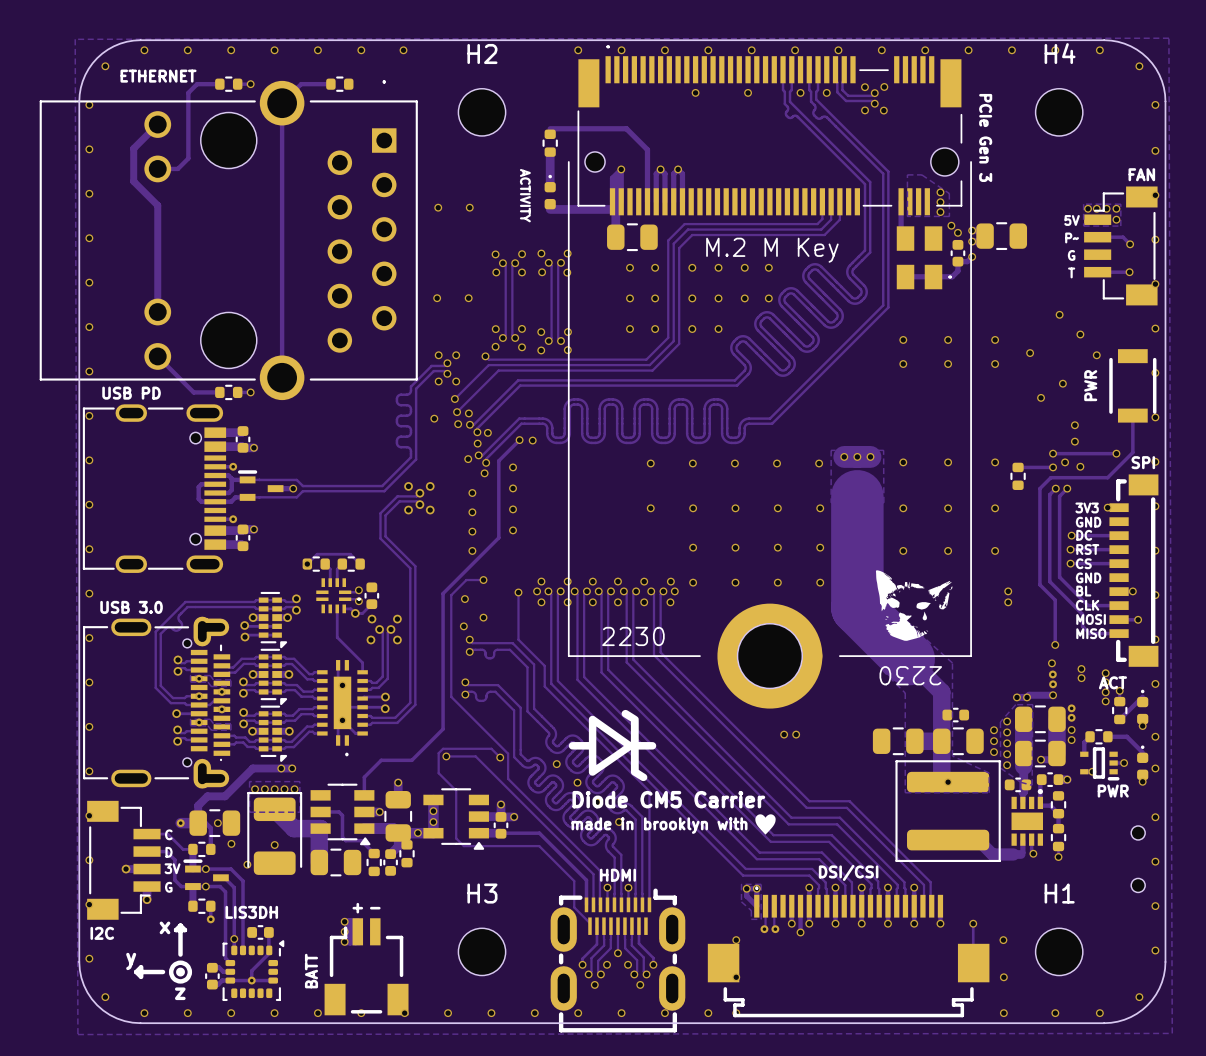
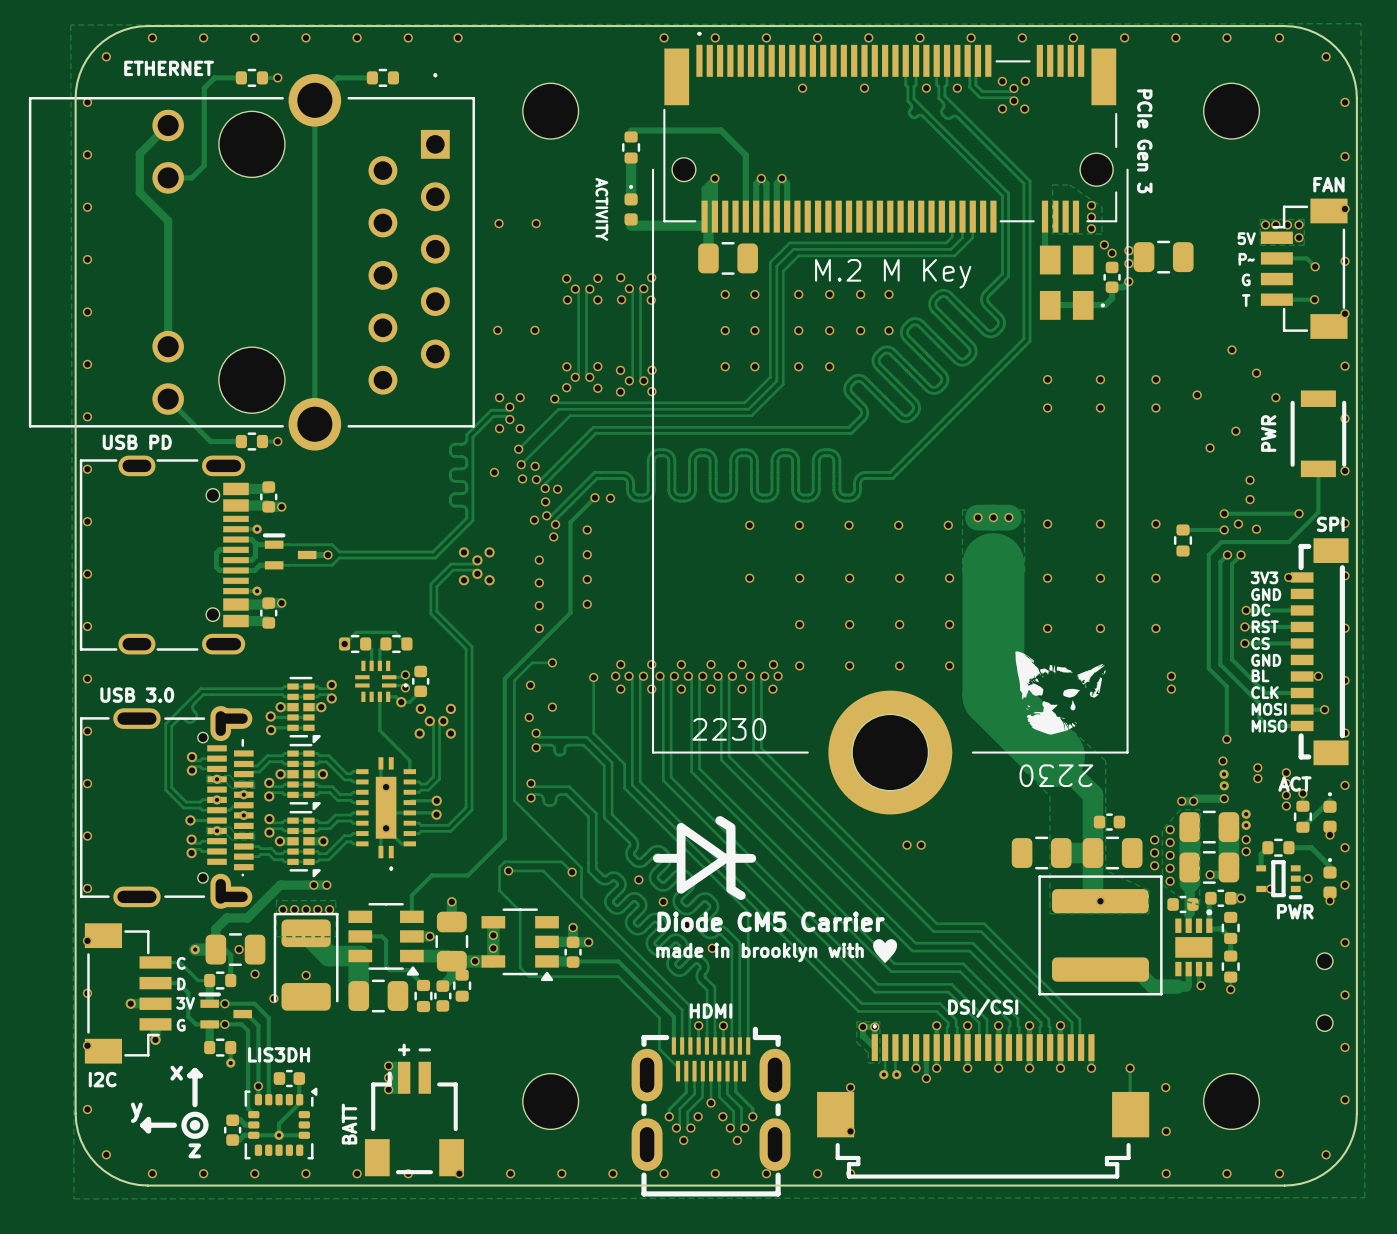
H2 name: H2 (482, 53) -> none
H4 name: H4 (1060, 53) -> none
H3 name: H3 (482, 893) -> none
H1 name: H1 (1059, 893) -> none

